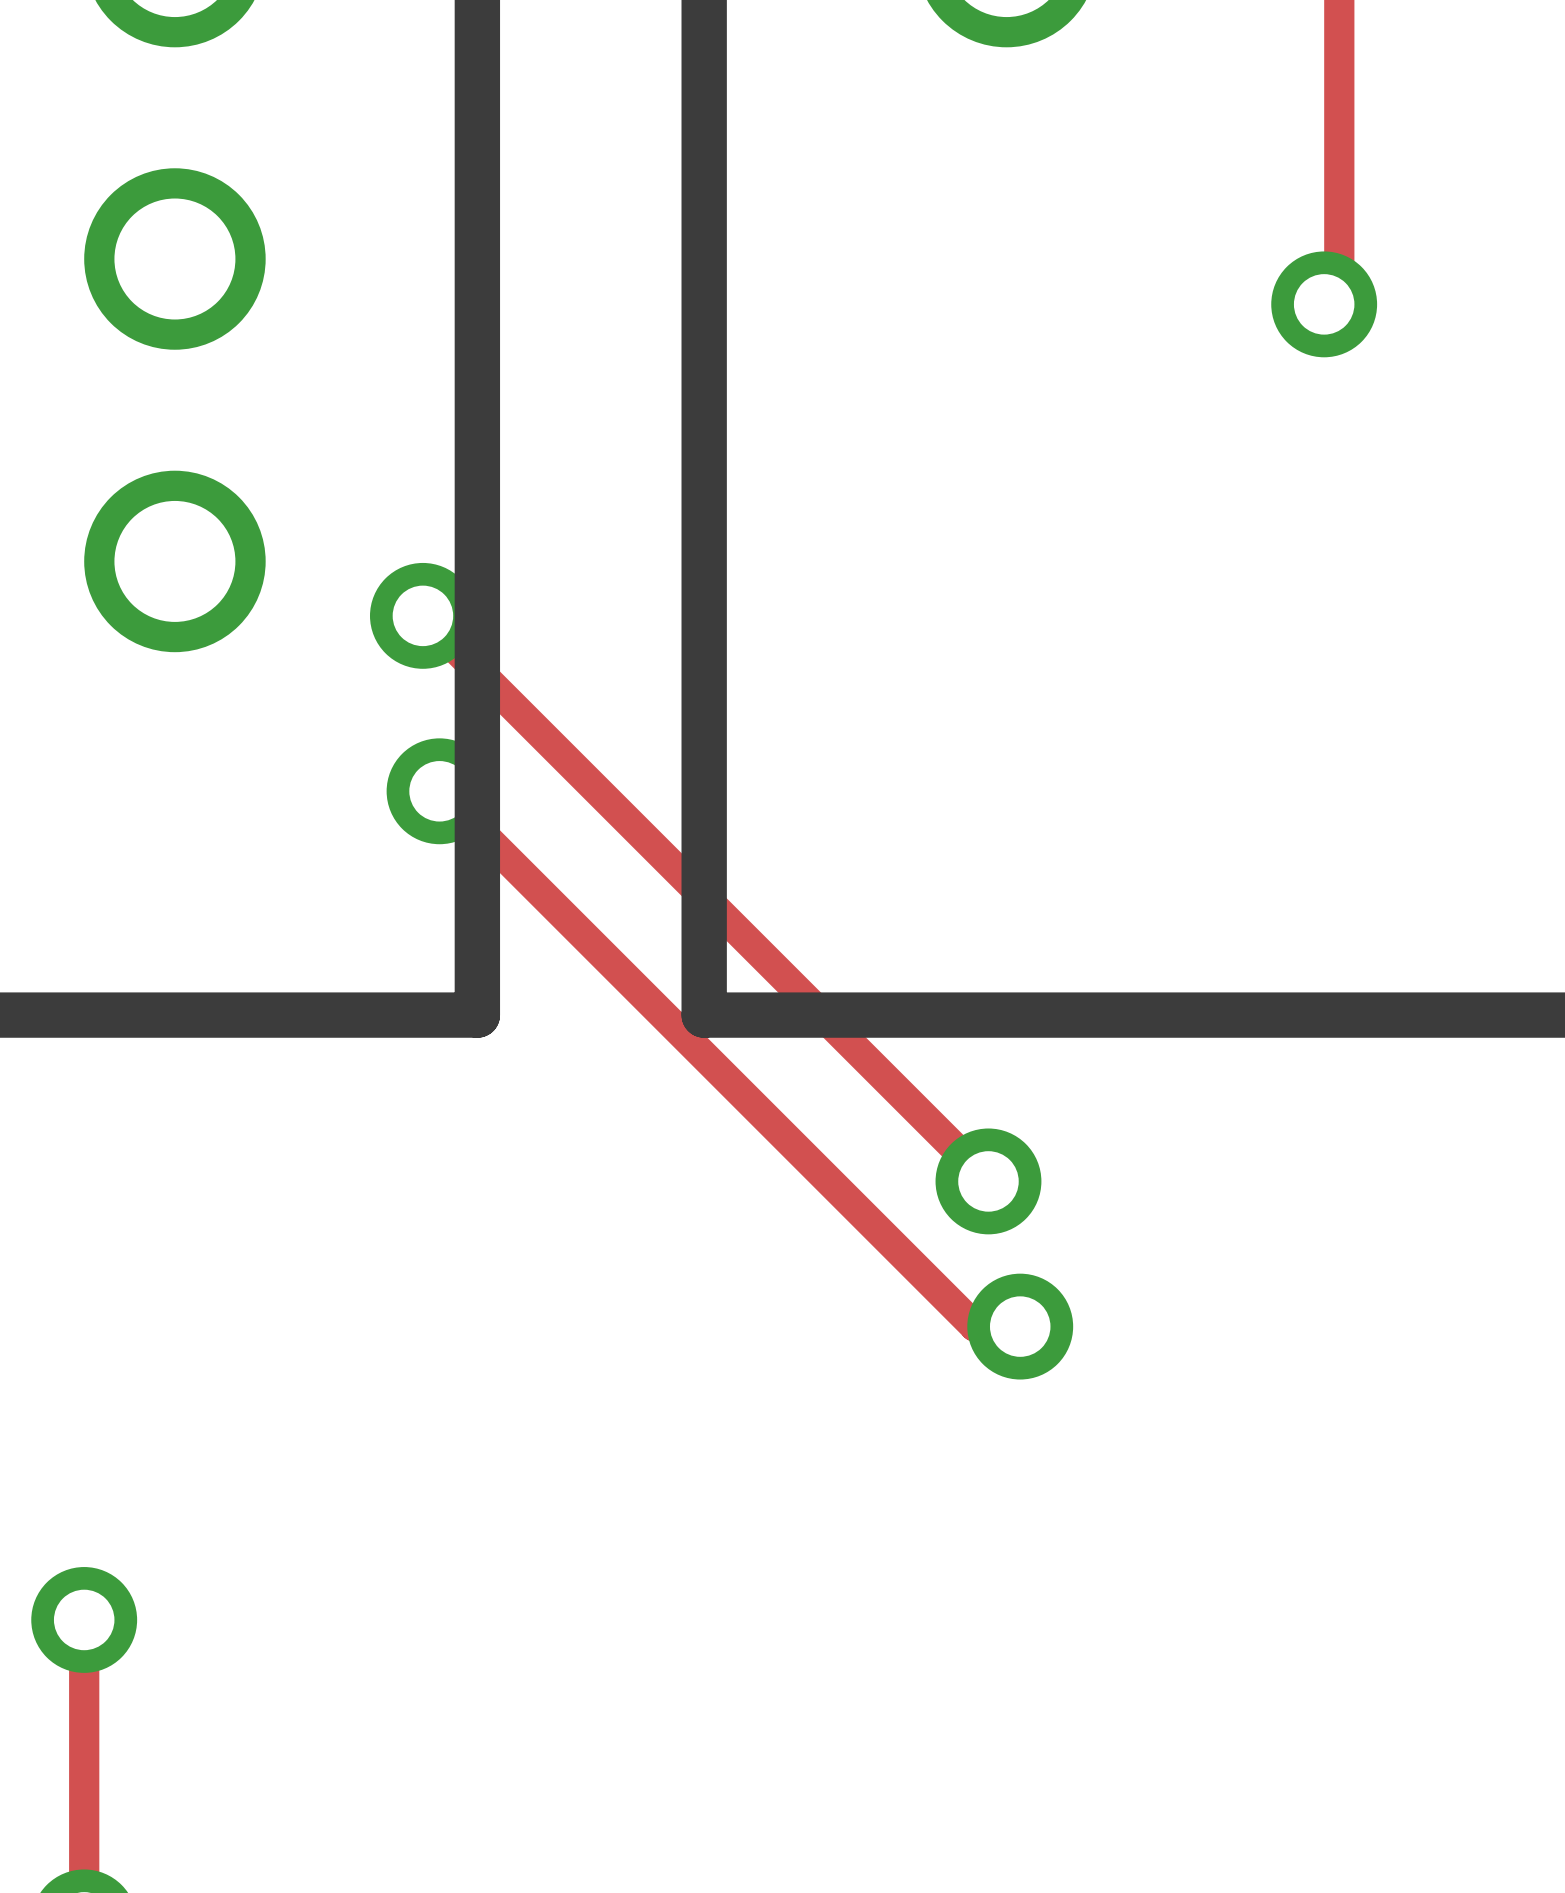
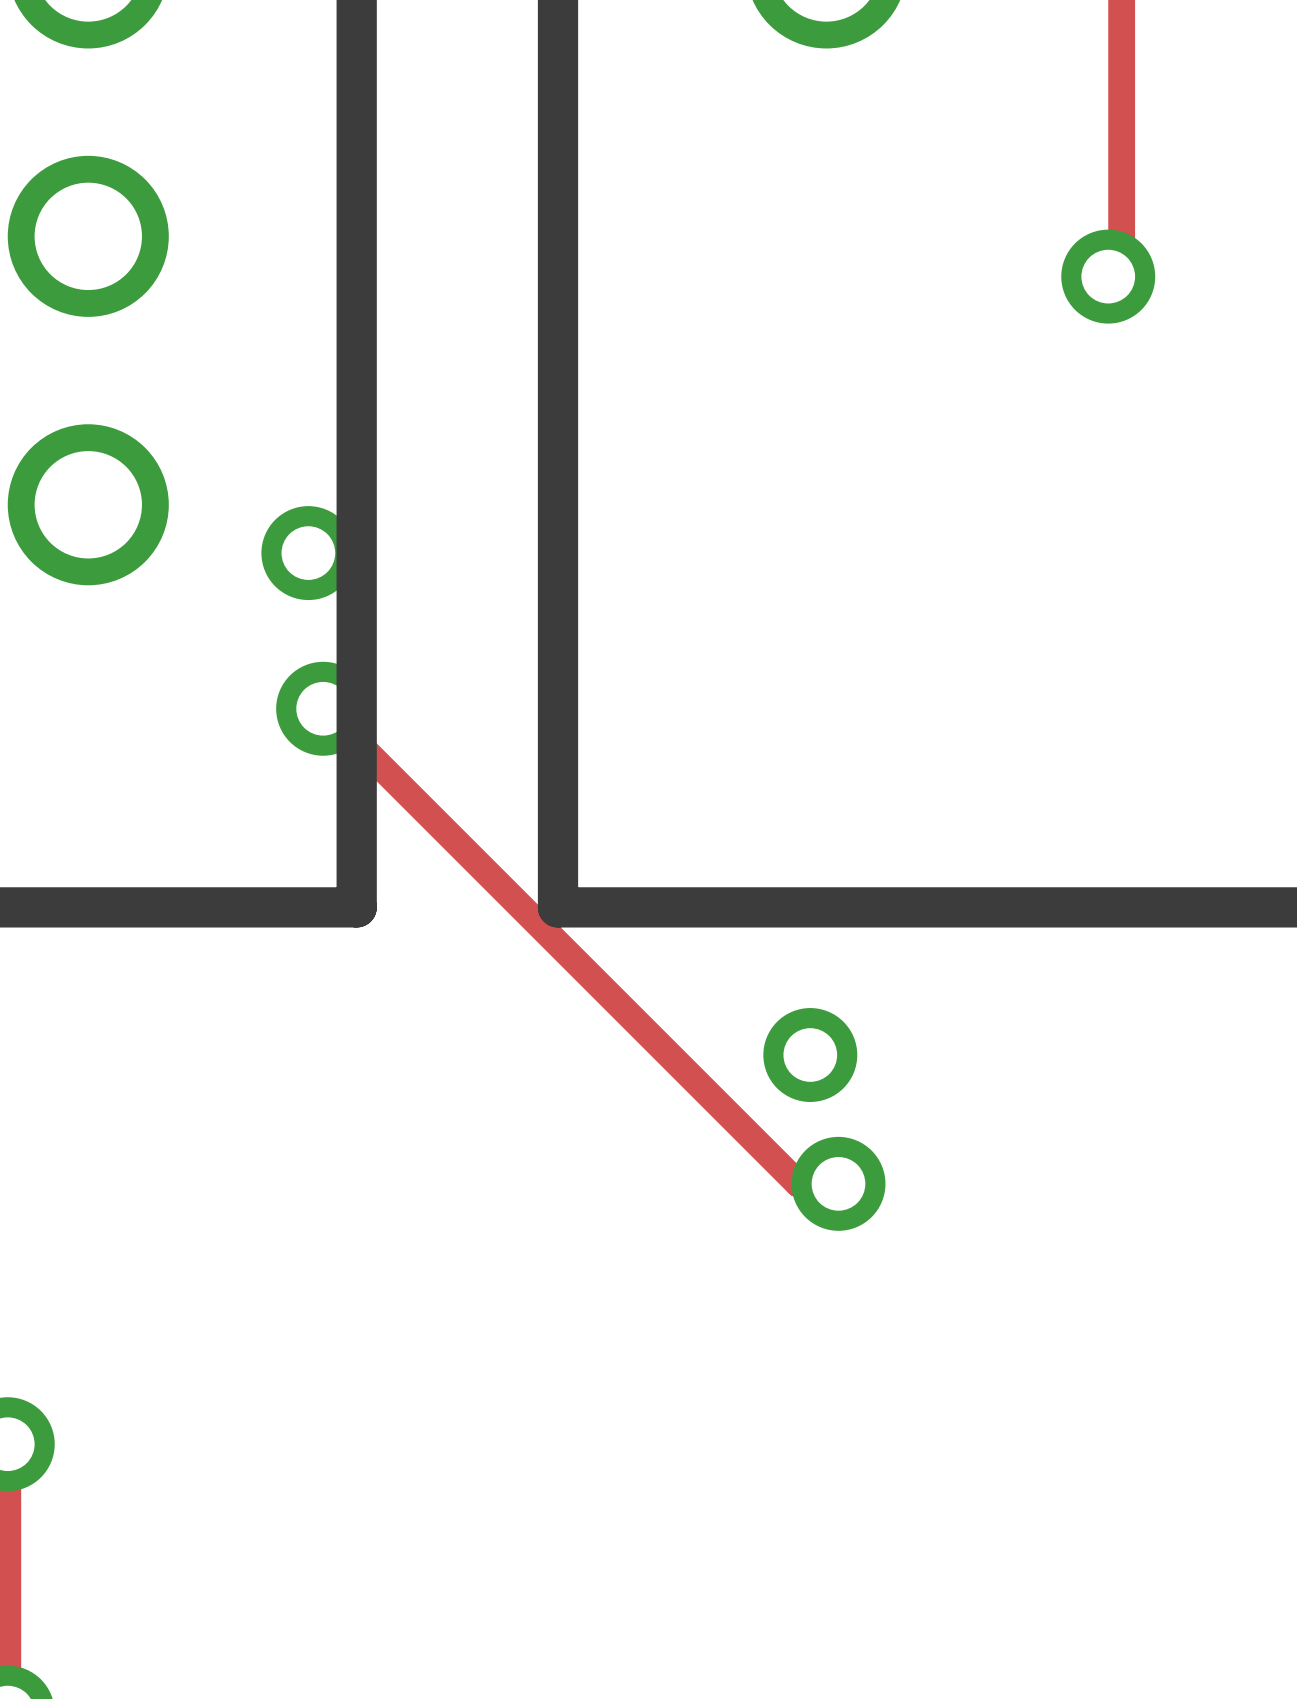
track: (422, 615) (988, 1181) -> none

